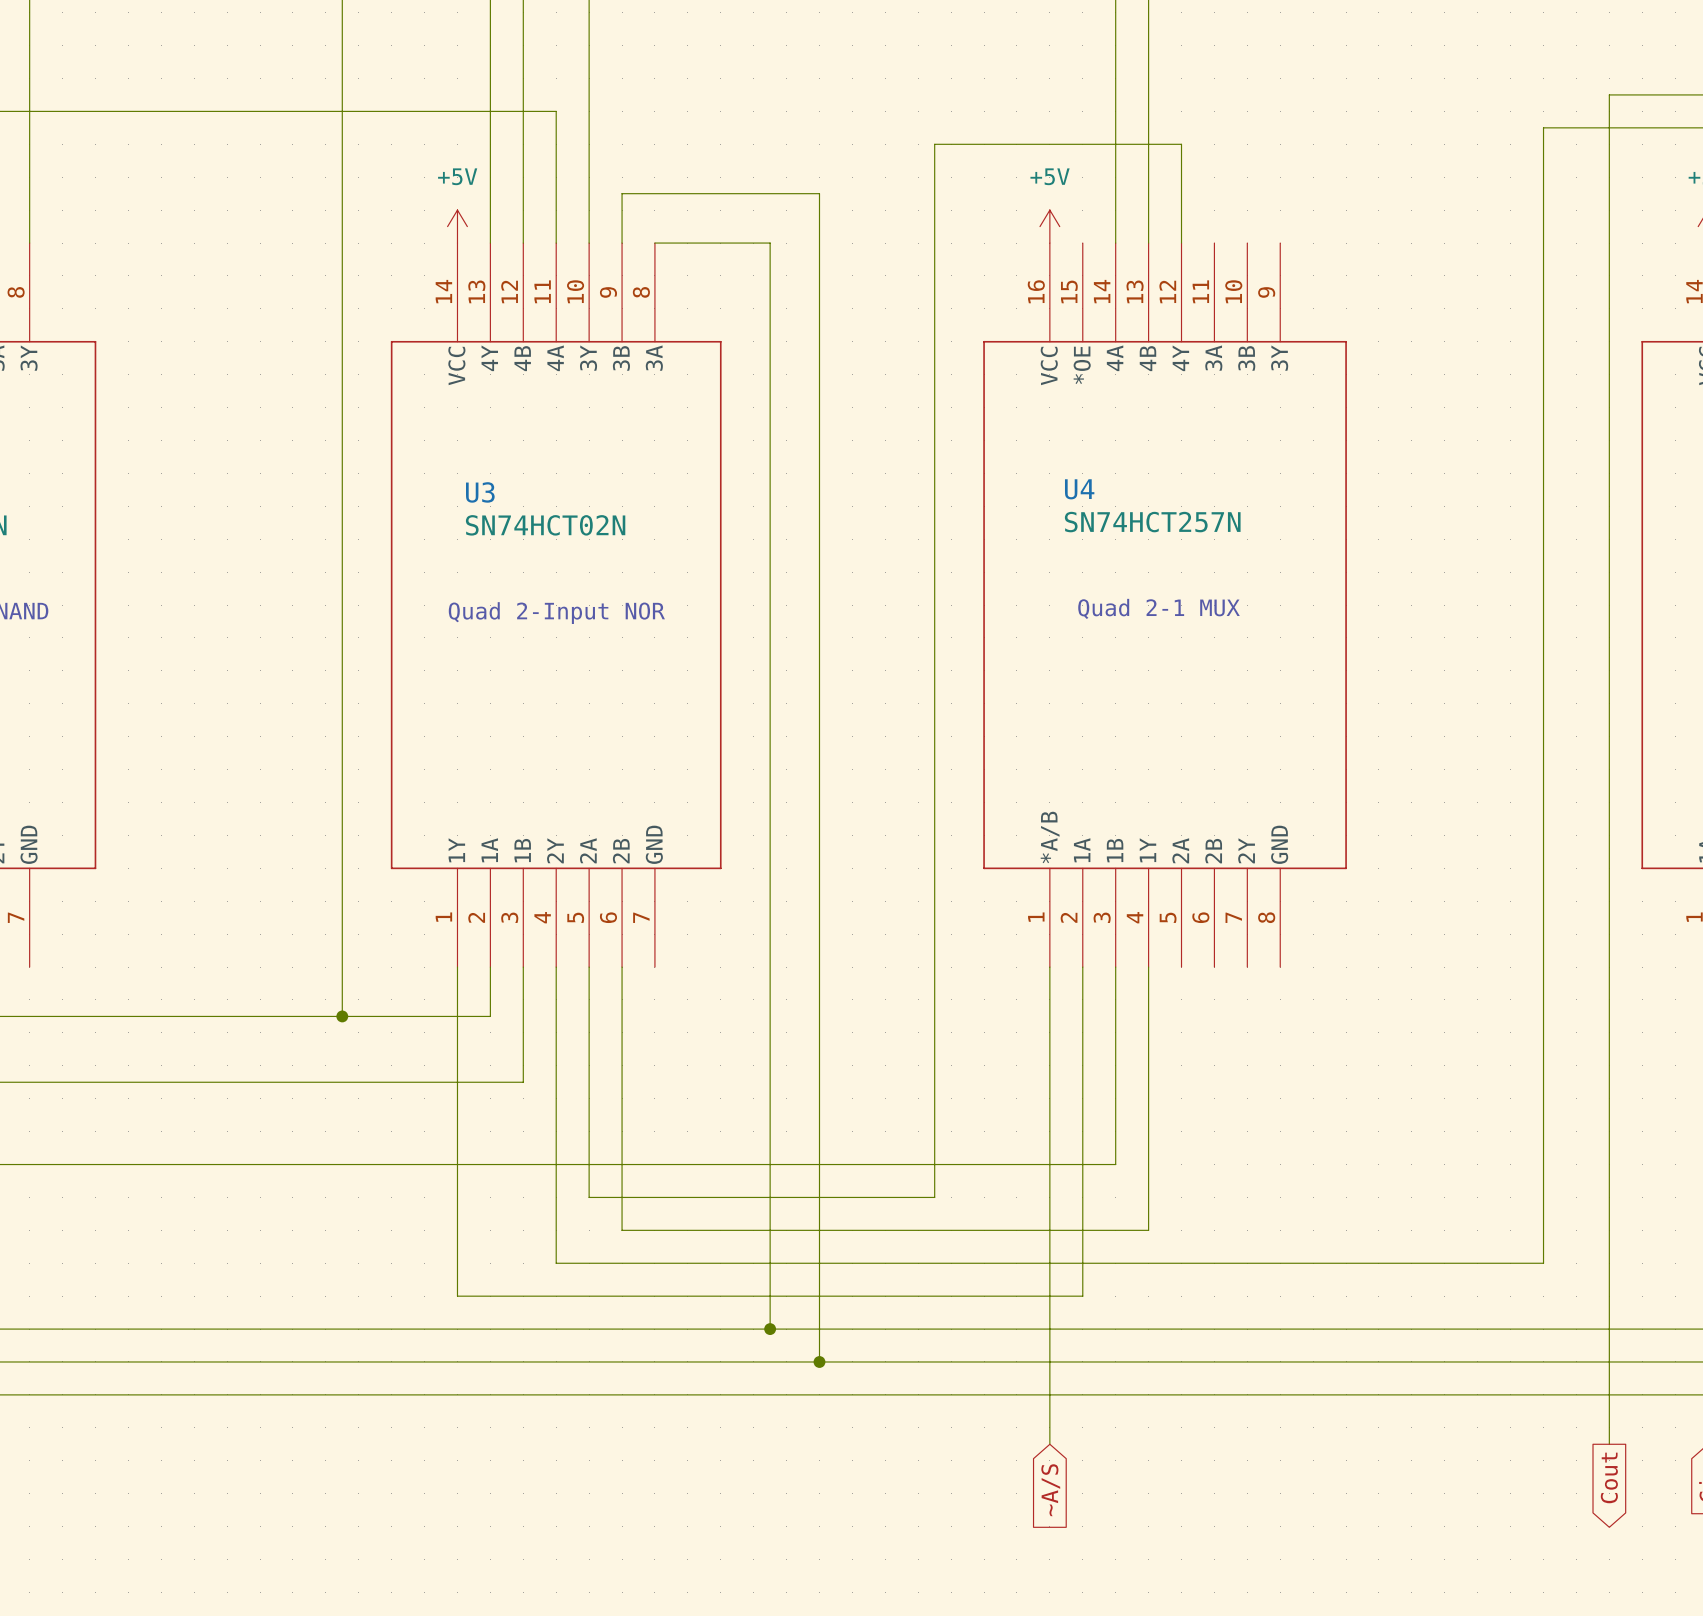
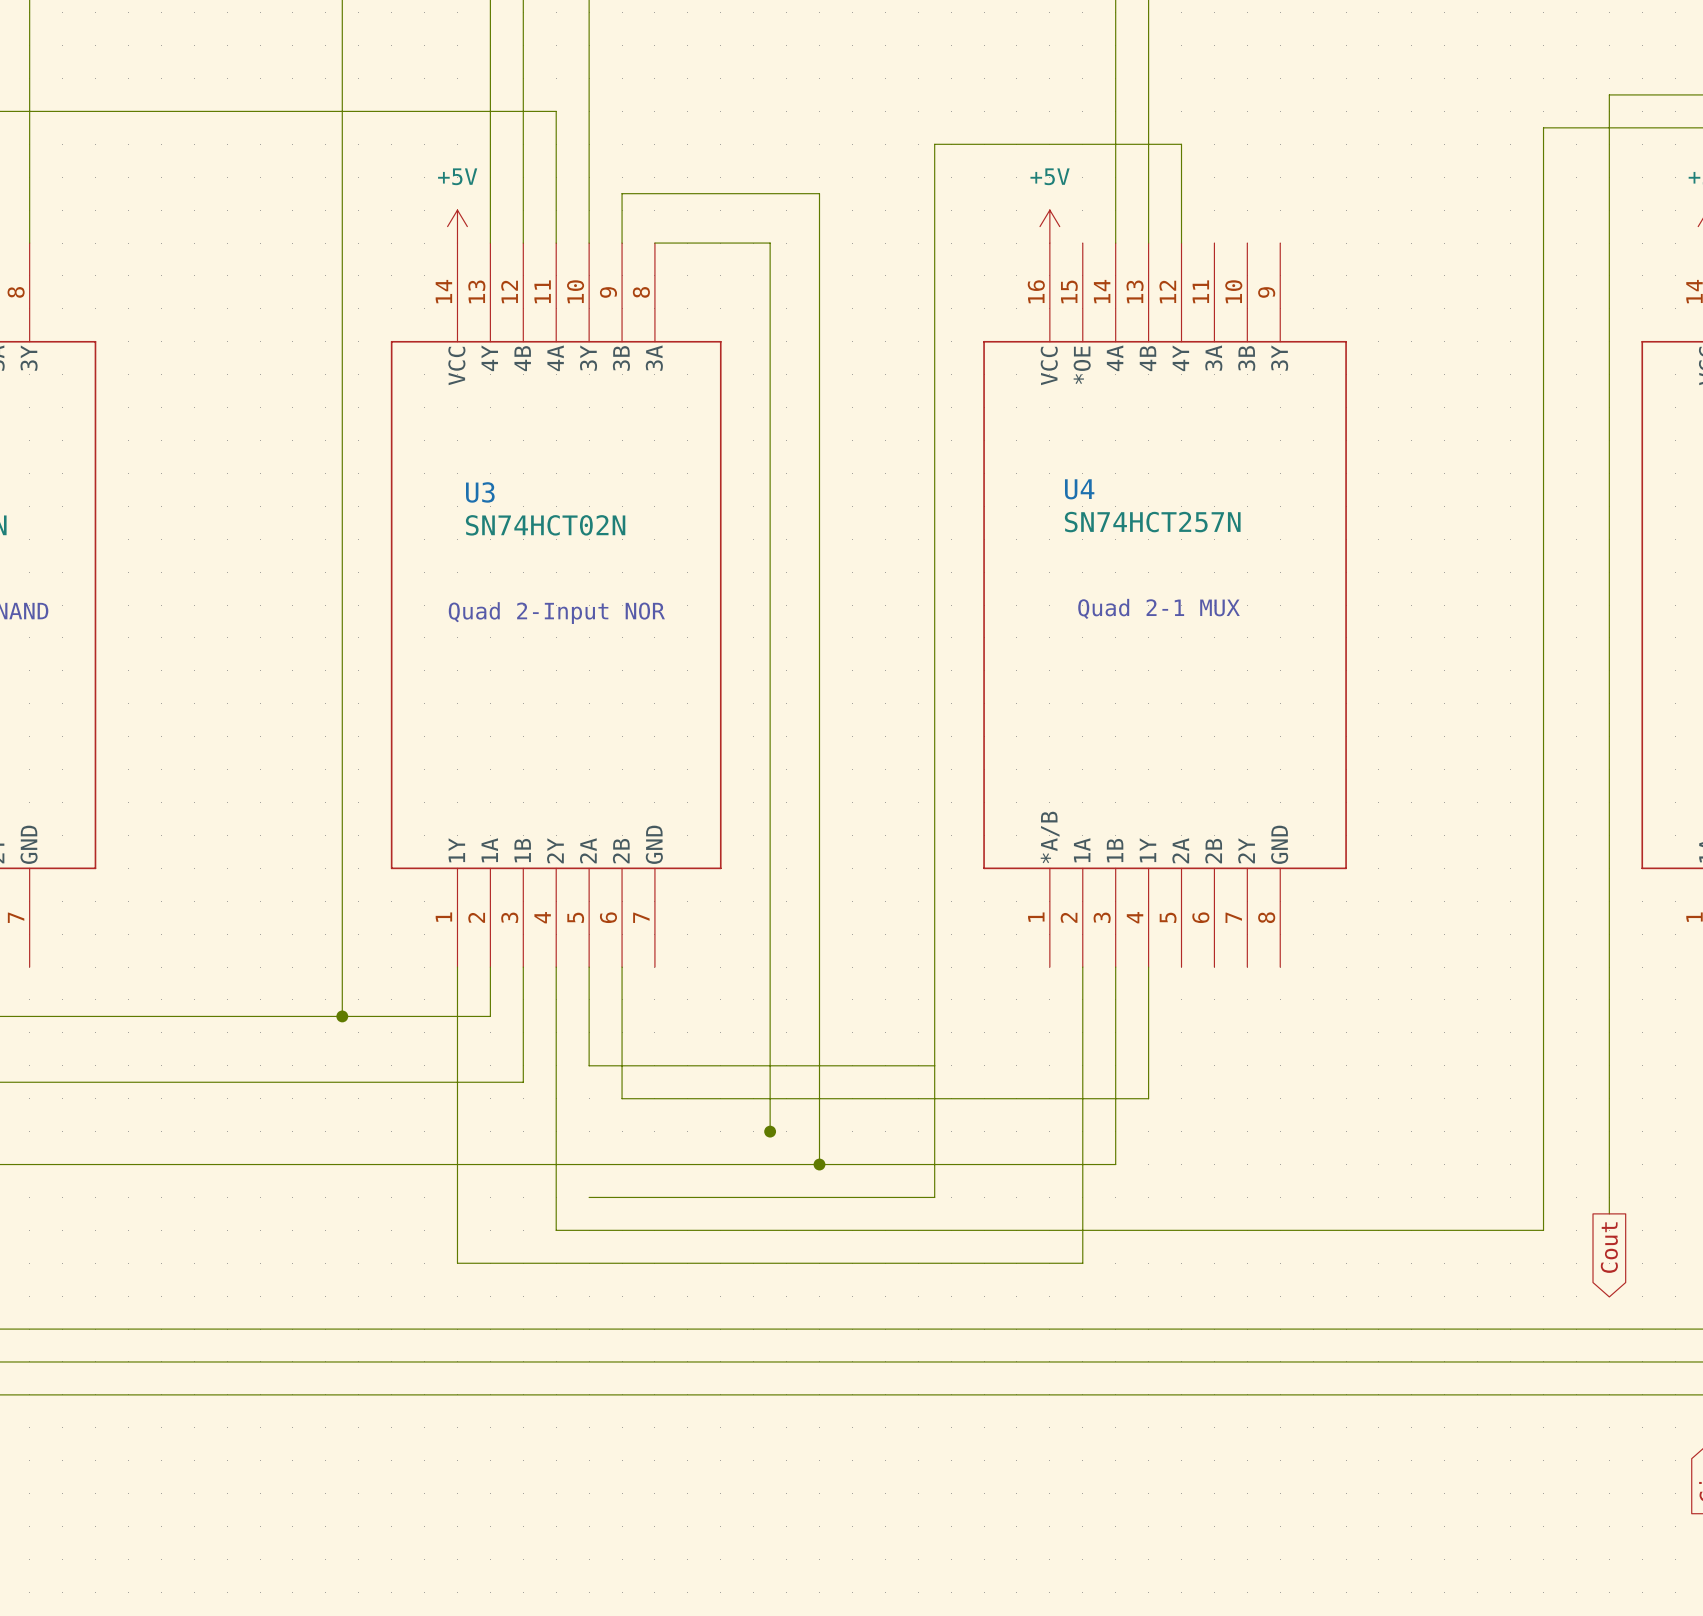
wire: (1049, 967) (1049, 1444) -> none
wire: (589, 1065) (589, 1197) -> (589, 1065) (934, 1065)
wire: (622, 1098) (622, 1230) -> (622, 1098) (1148, 1098)
wire: (1148, 1098) (1148, 1230) -> (1543, 1230) (1148, 1230)
wire: (770, 1131) (770, 1329) -> none
junction: none -> (770, 1131)
wire: (819, 1164) (819, 1361) -> none
junction: none -> (819, 1164)
wire: (1609, 1213) (1609, 1444) -> none
wire: (556, 1230) (556, 1263) -> (556, 1230) (622, 1230)
wire: (1543, 1230) (1543, 1263) (1082, 1263) (1082, 1296) (457, 1296) (457, 1263) -> (556, 1263) (457, 1263)
junction: (770, 1329) -> none
junction: (819, 1361) -> none
global label position: Cout (1609, 1477) -> Cout (1609, 1247)
global label: ~A/S (1050, 1490) -> none

